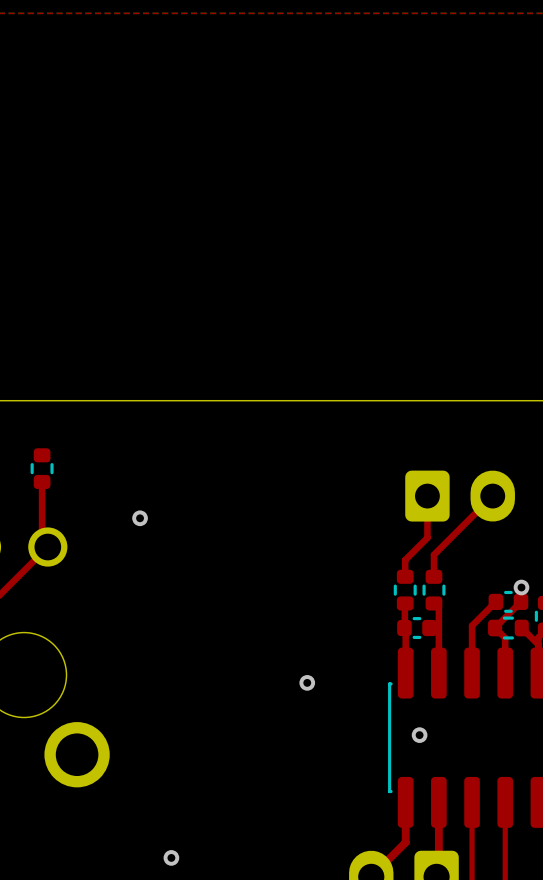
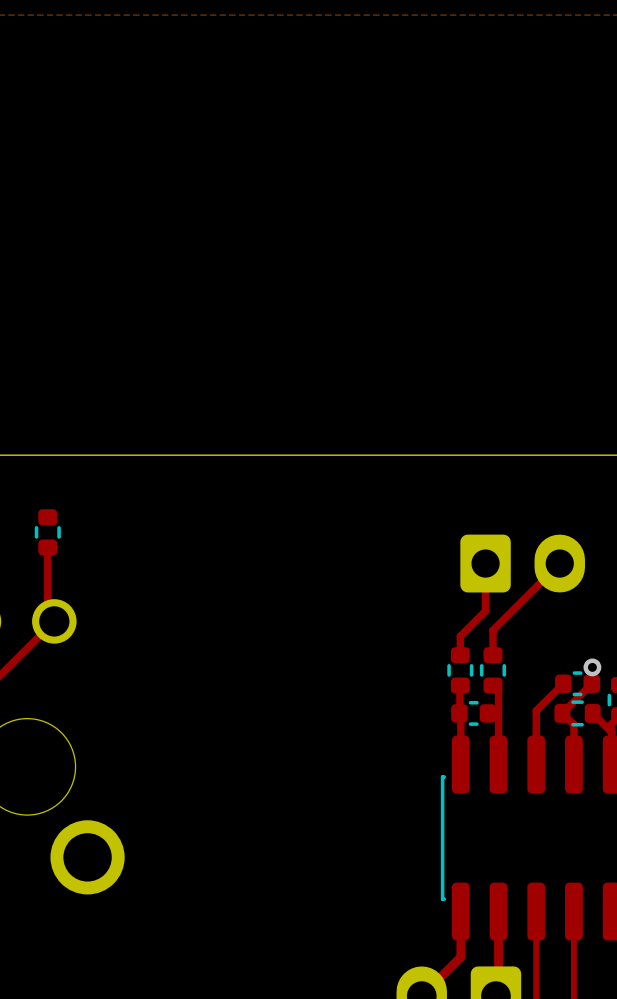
via: (140, 518) -> none
via: (307, 682) -> none
via: (419, 735) -> none
via: (171, 857) -> none

